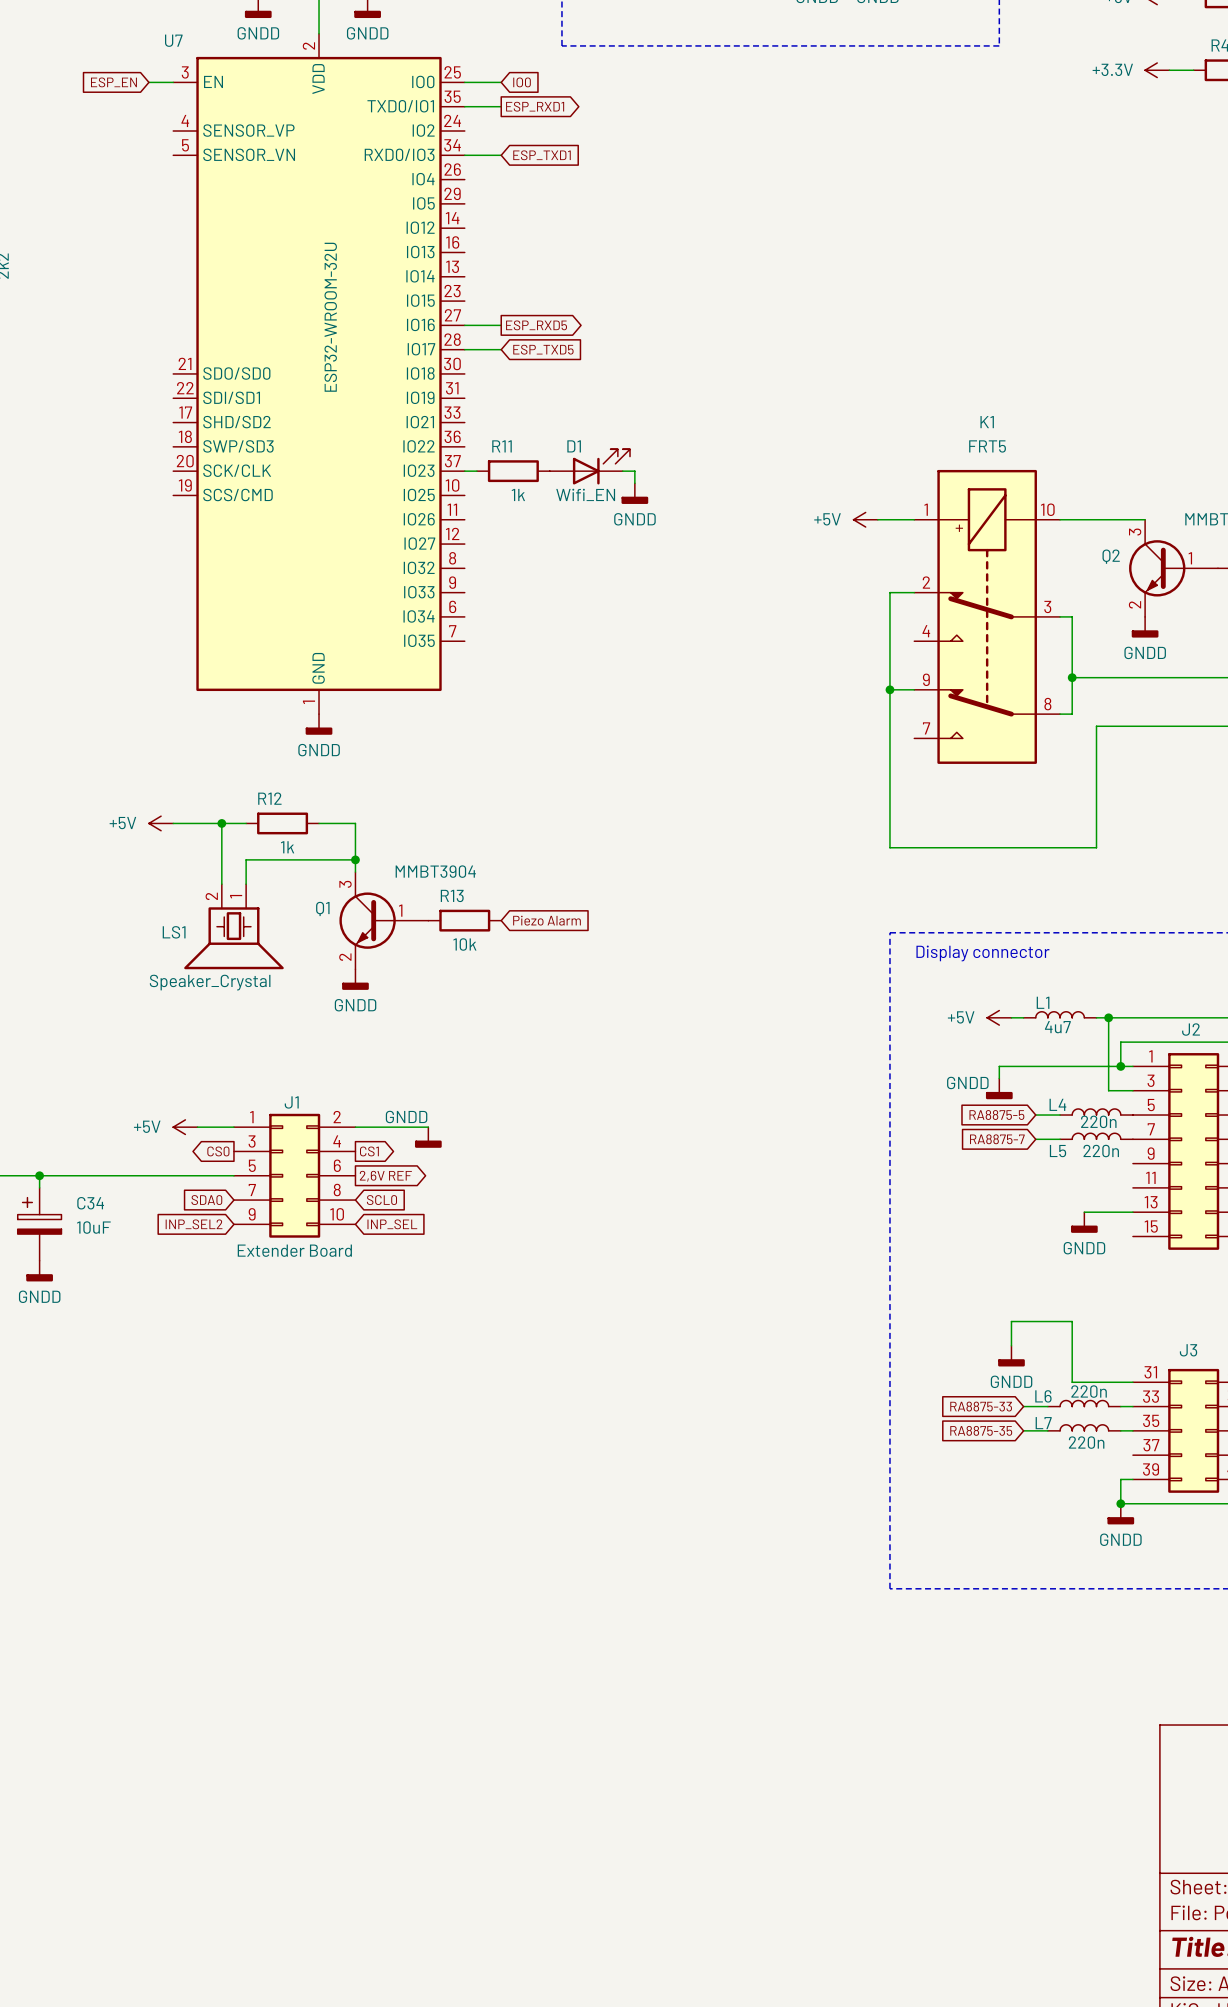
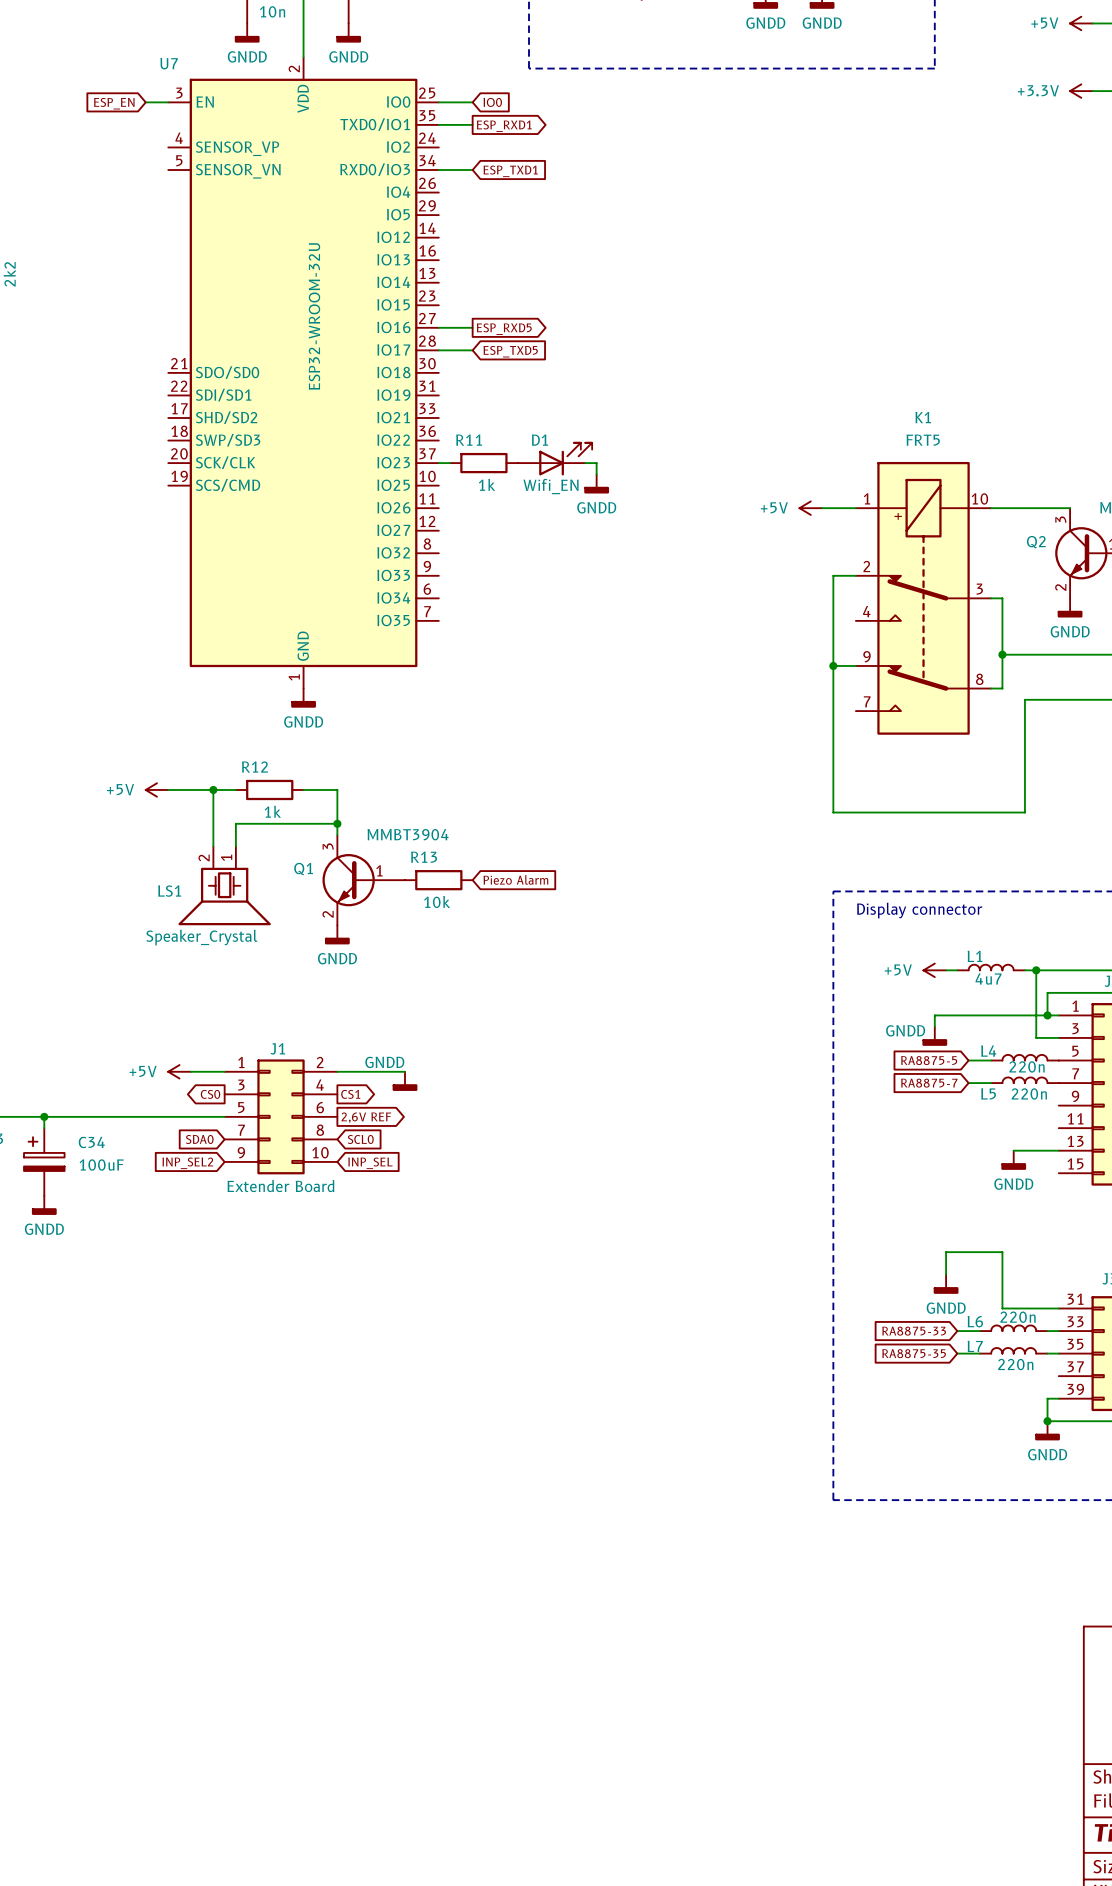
C34 value: 10uF (93, 1227) -> 100uF (101, 1164)

